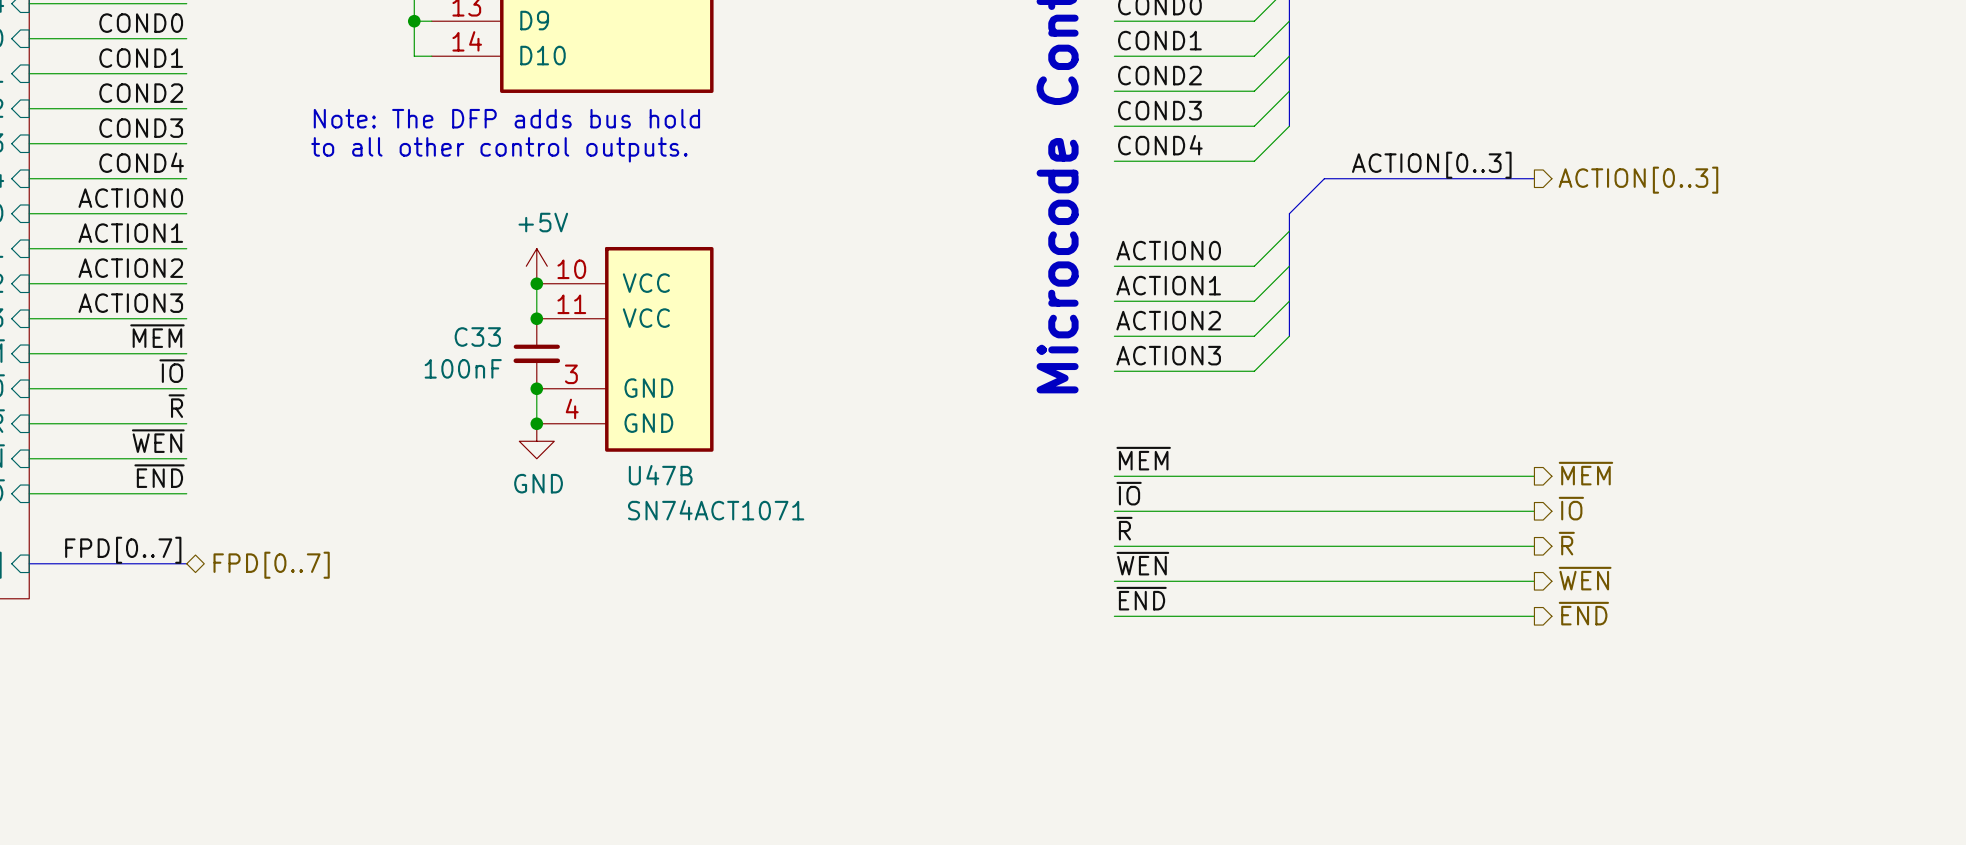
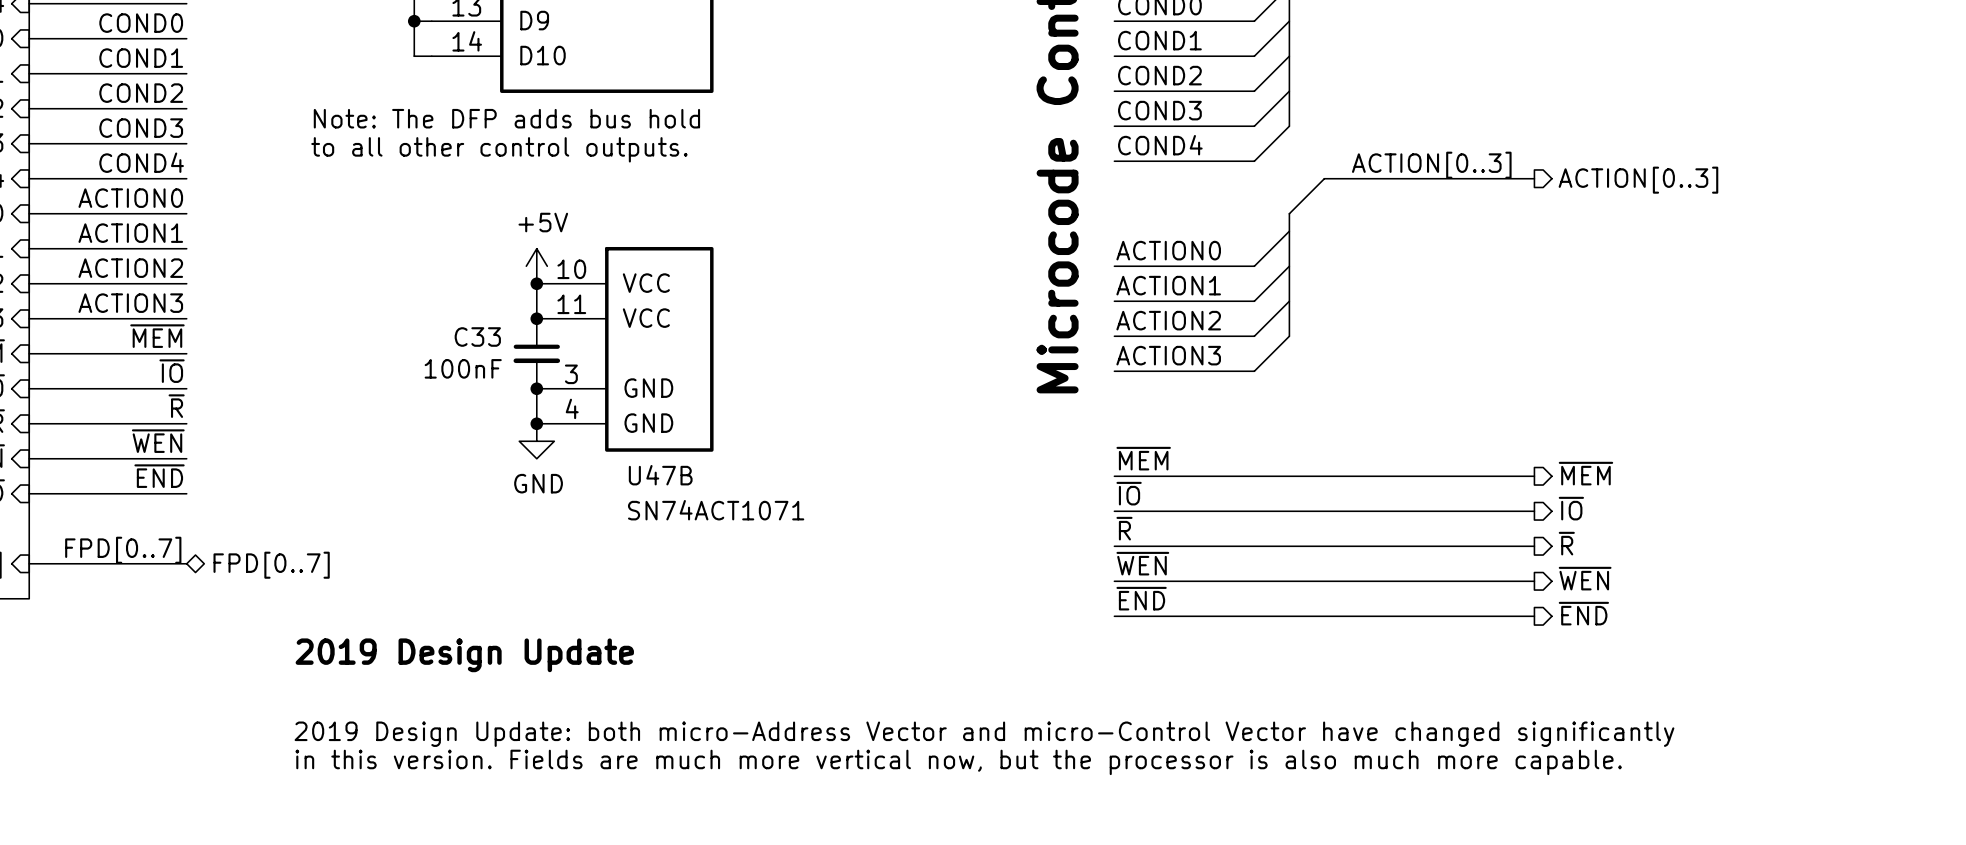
text: none -> 2019 Design Update (464, 655)
text: none -> 2019 Design Update: both micro-Address Vector and micro-Control Vector have changed significantly (984, 734)
text: none -> in this version. Fields are much more vertical now, but the processor is also much more capable. (958, 762)

